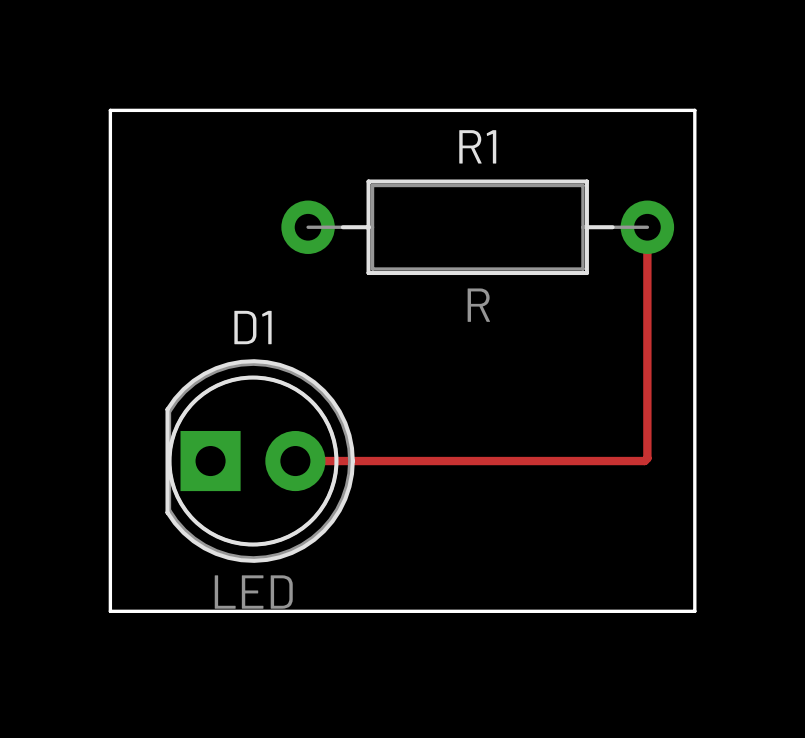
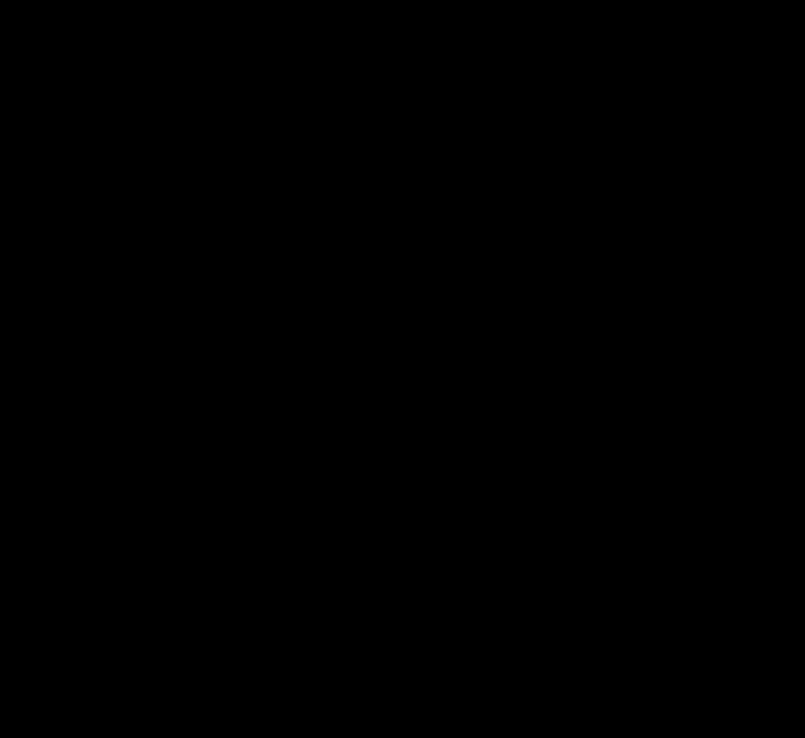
board edge: (110, 110) (694, 110) (694, 611) (110, 611) (110, 110) -> none
R1: R (477, 227) -> none
track: (647, 227) (647, 458) (644, 461) (295, 461) -> none
D1: LED (260, 461) -> none

